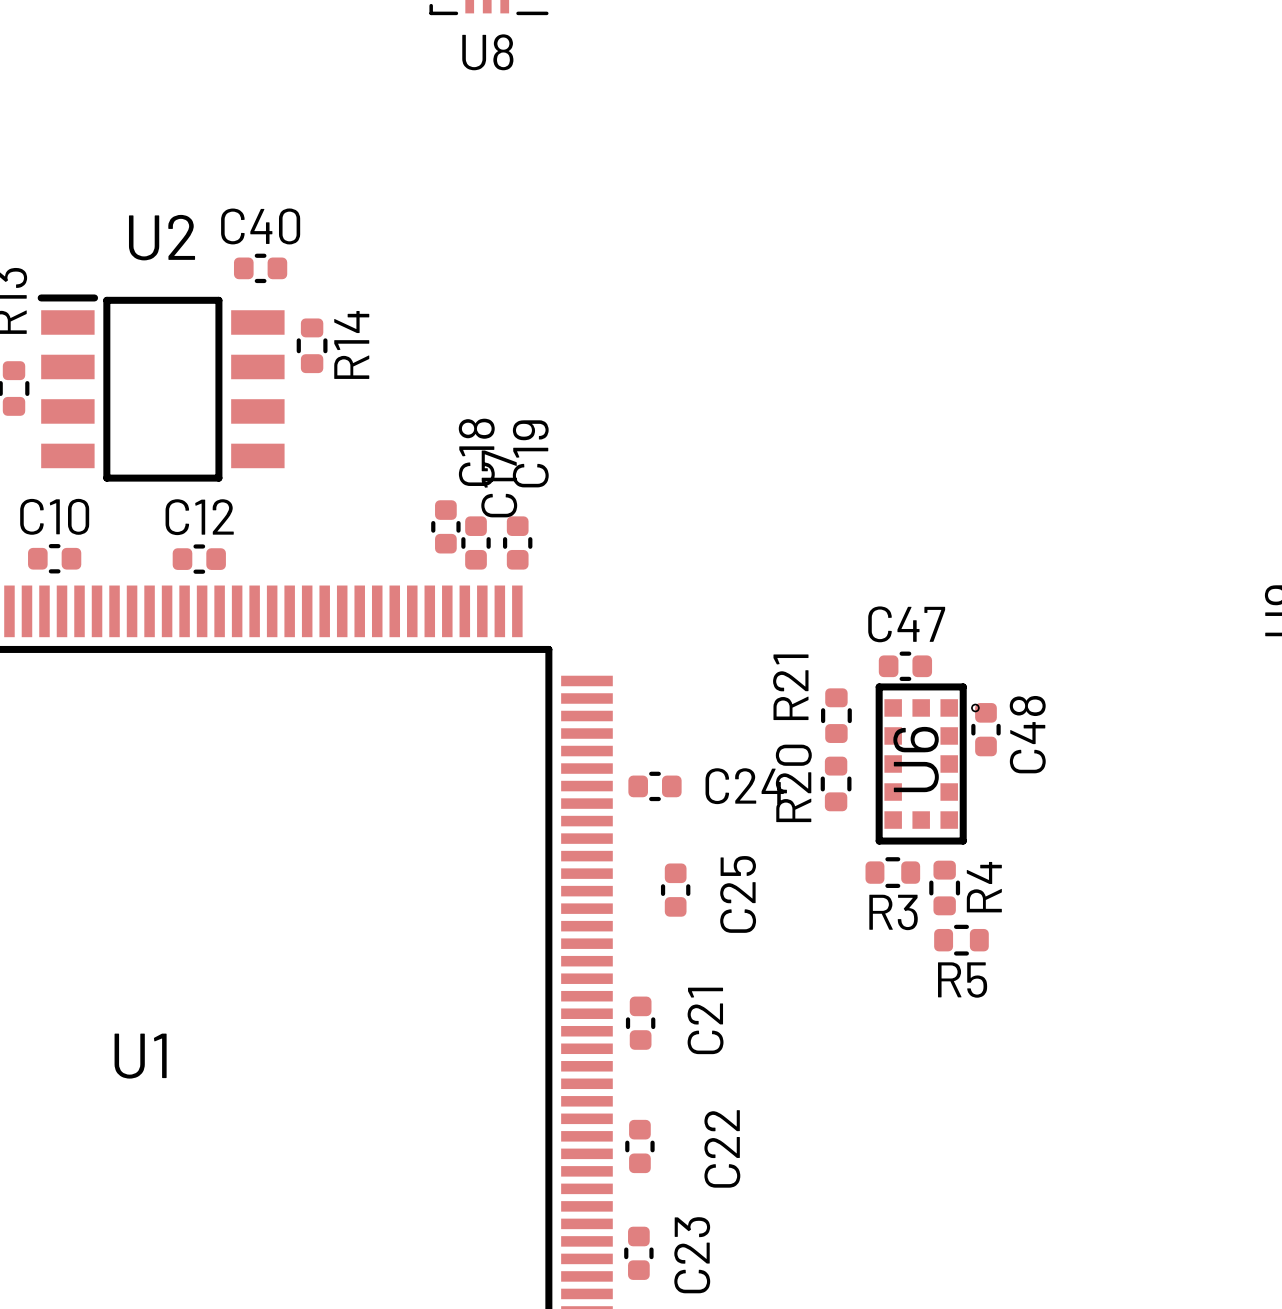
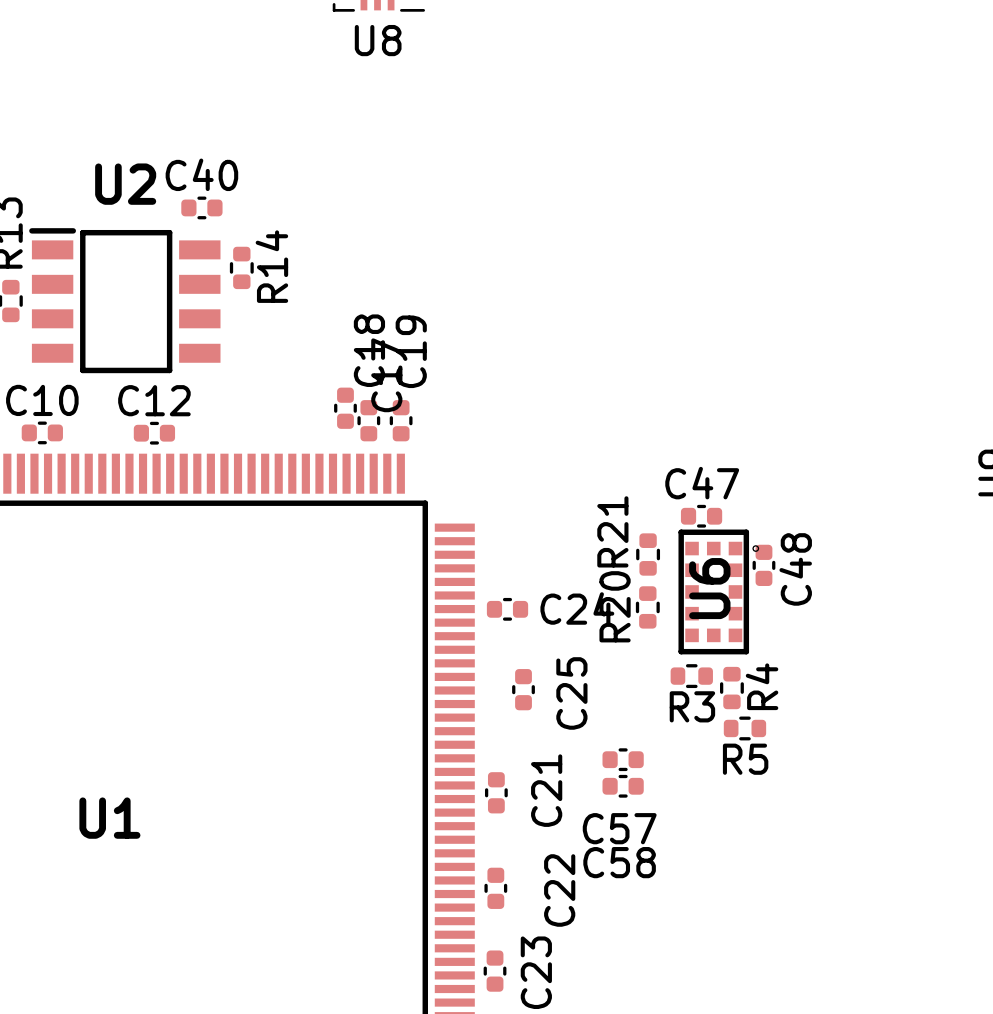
C57: none -> (623, 759)
C58: none -> (623, 786)

